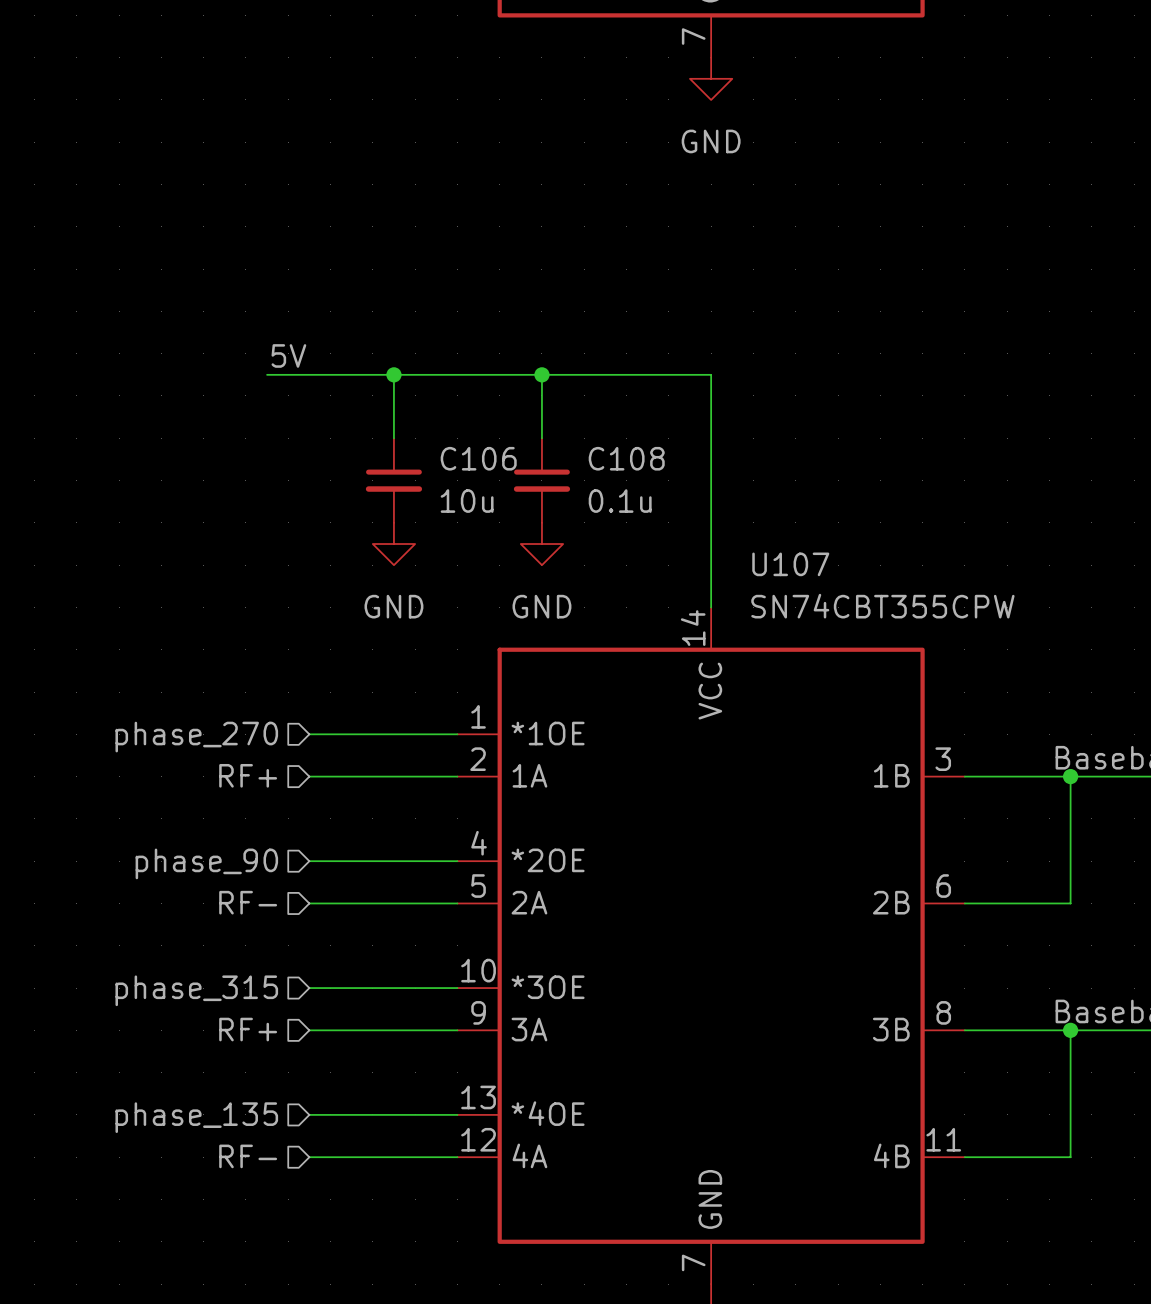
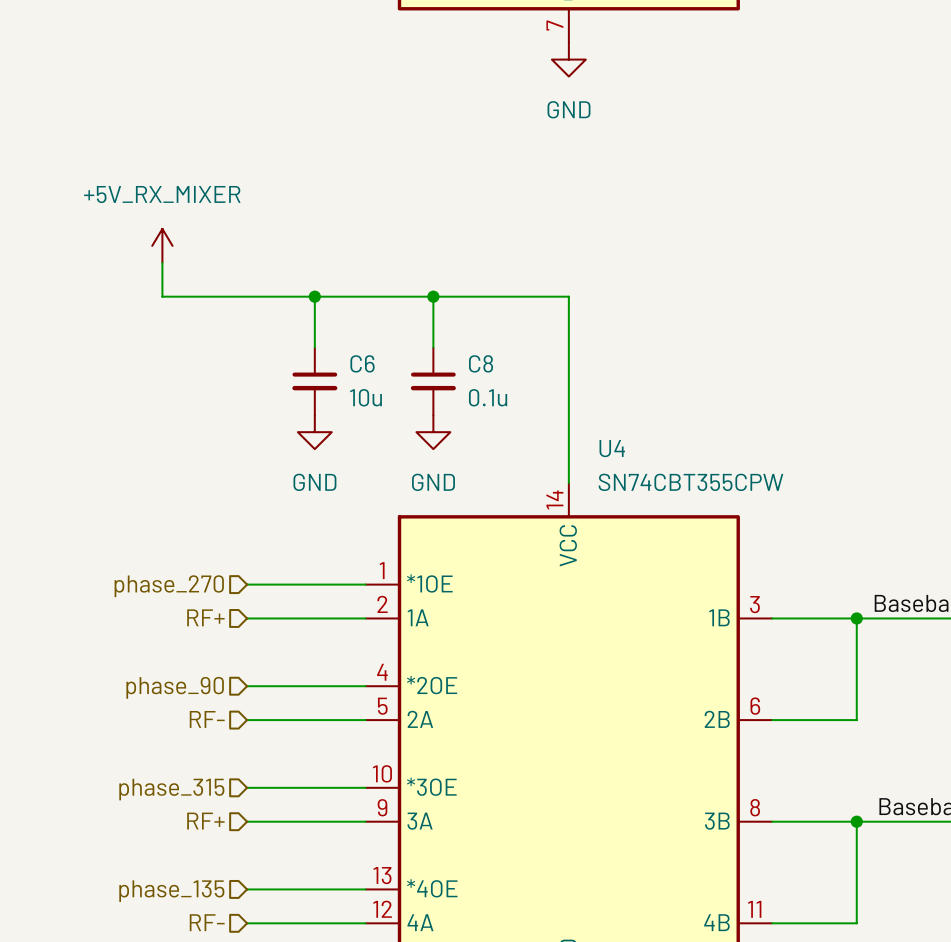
power symbol: none -> +5V_RX_MIXER (162, 245)
wire: none -> (162, 262) (162, 296) (213, 296)
label: 5V (288, 355) -> none
C106 name: C106 (478, 458) -> C6 (362, 363)
C108 name: C108 (626, 458) -> C8 (481, 363)
U107 name: U107 (790, 564) -> U4 (612, 448)

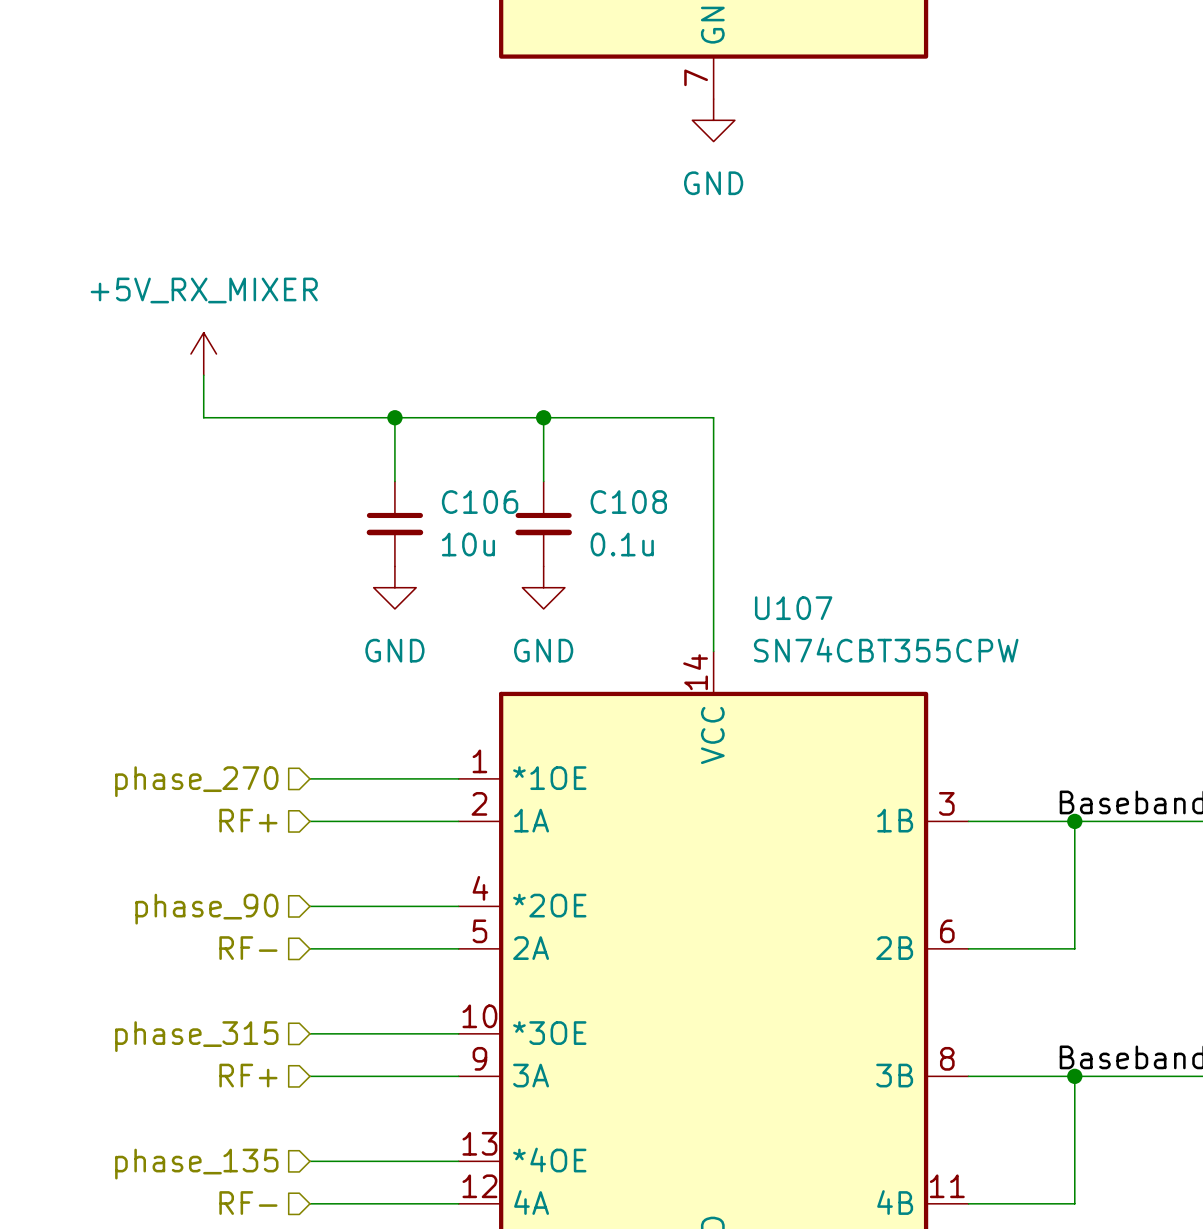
C6 name: C6 (362, 363) -> C106 (480, 502)
C8 name: C8 (481, 363) -> C108 (628, 502)
U4 name: U4 (612, 448) -> U107 (793, 608)

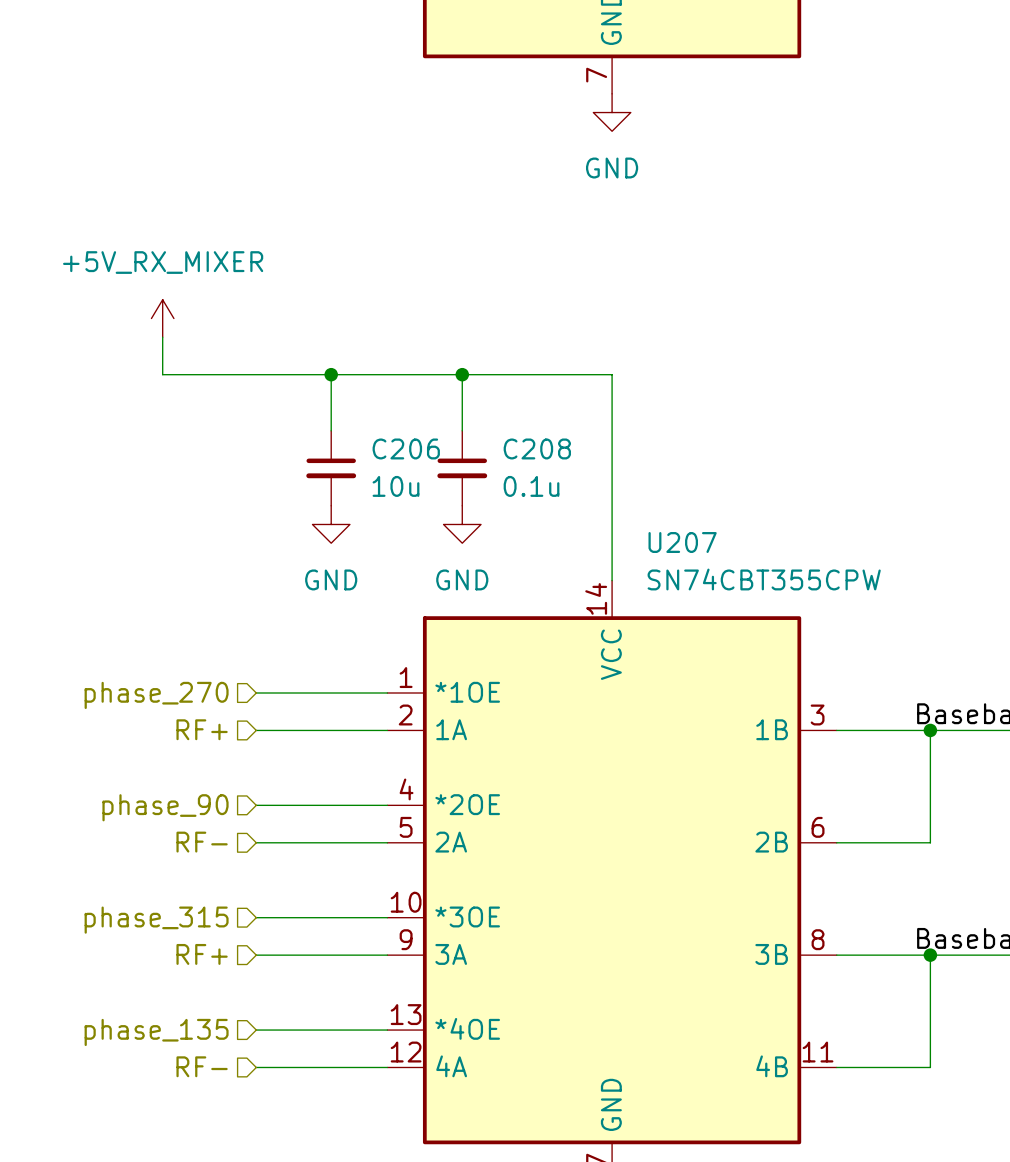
C106 name: C106 (480, 502) -> C206 (406, 448)
C108 name: C108 (628, 502) -> C208 (537, 448)
U107 name: U107 (793, 608) -> U207 (682, 542)

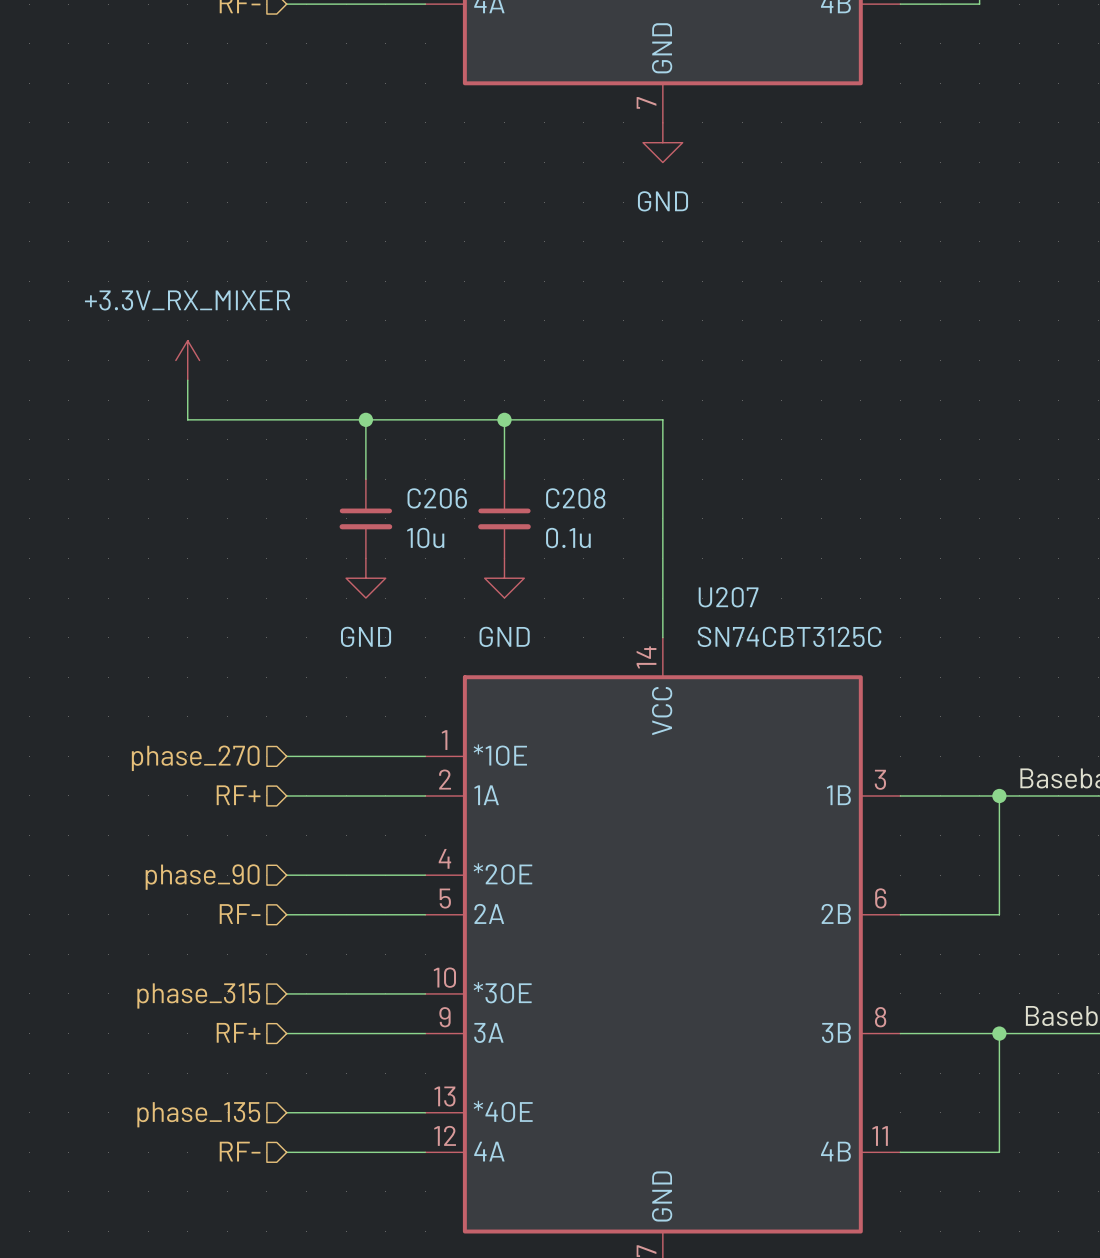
power symbol: +5V_RX_MIXER (162, 318) -> +3.3V_RX_MIXER (187, 360)
U207 value: SN74CBT355CPW (764, 579) -> SN74CBT3125C (789, 636)

